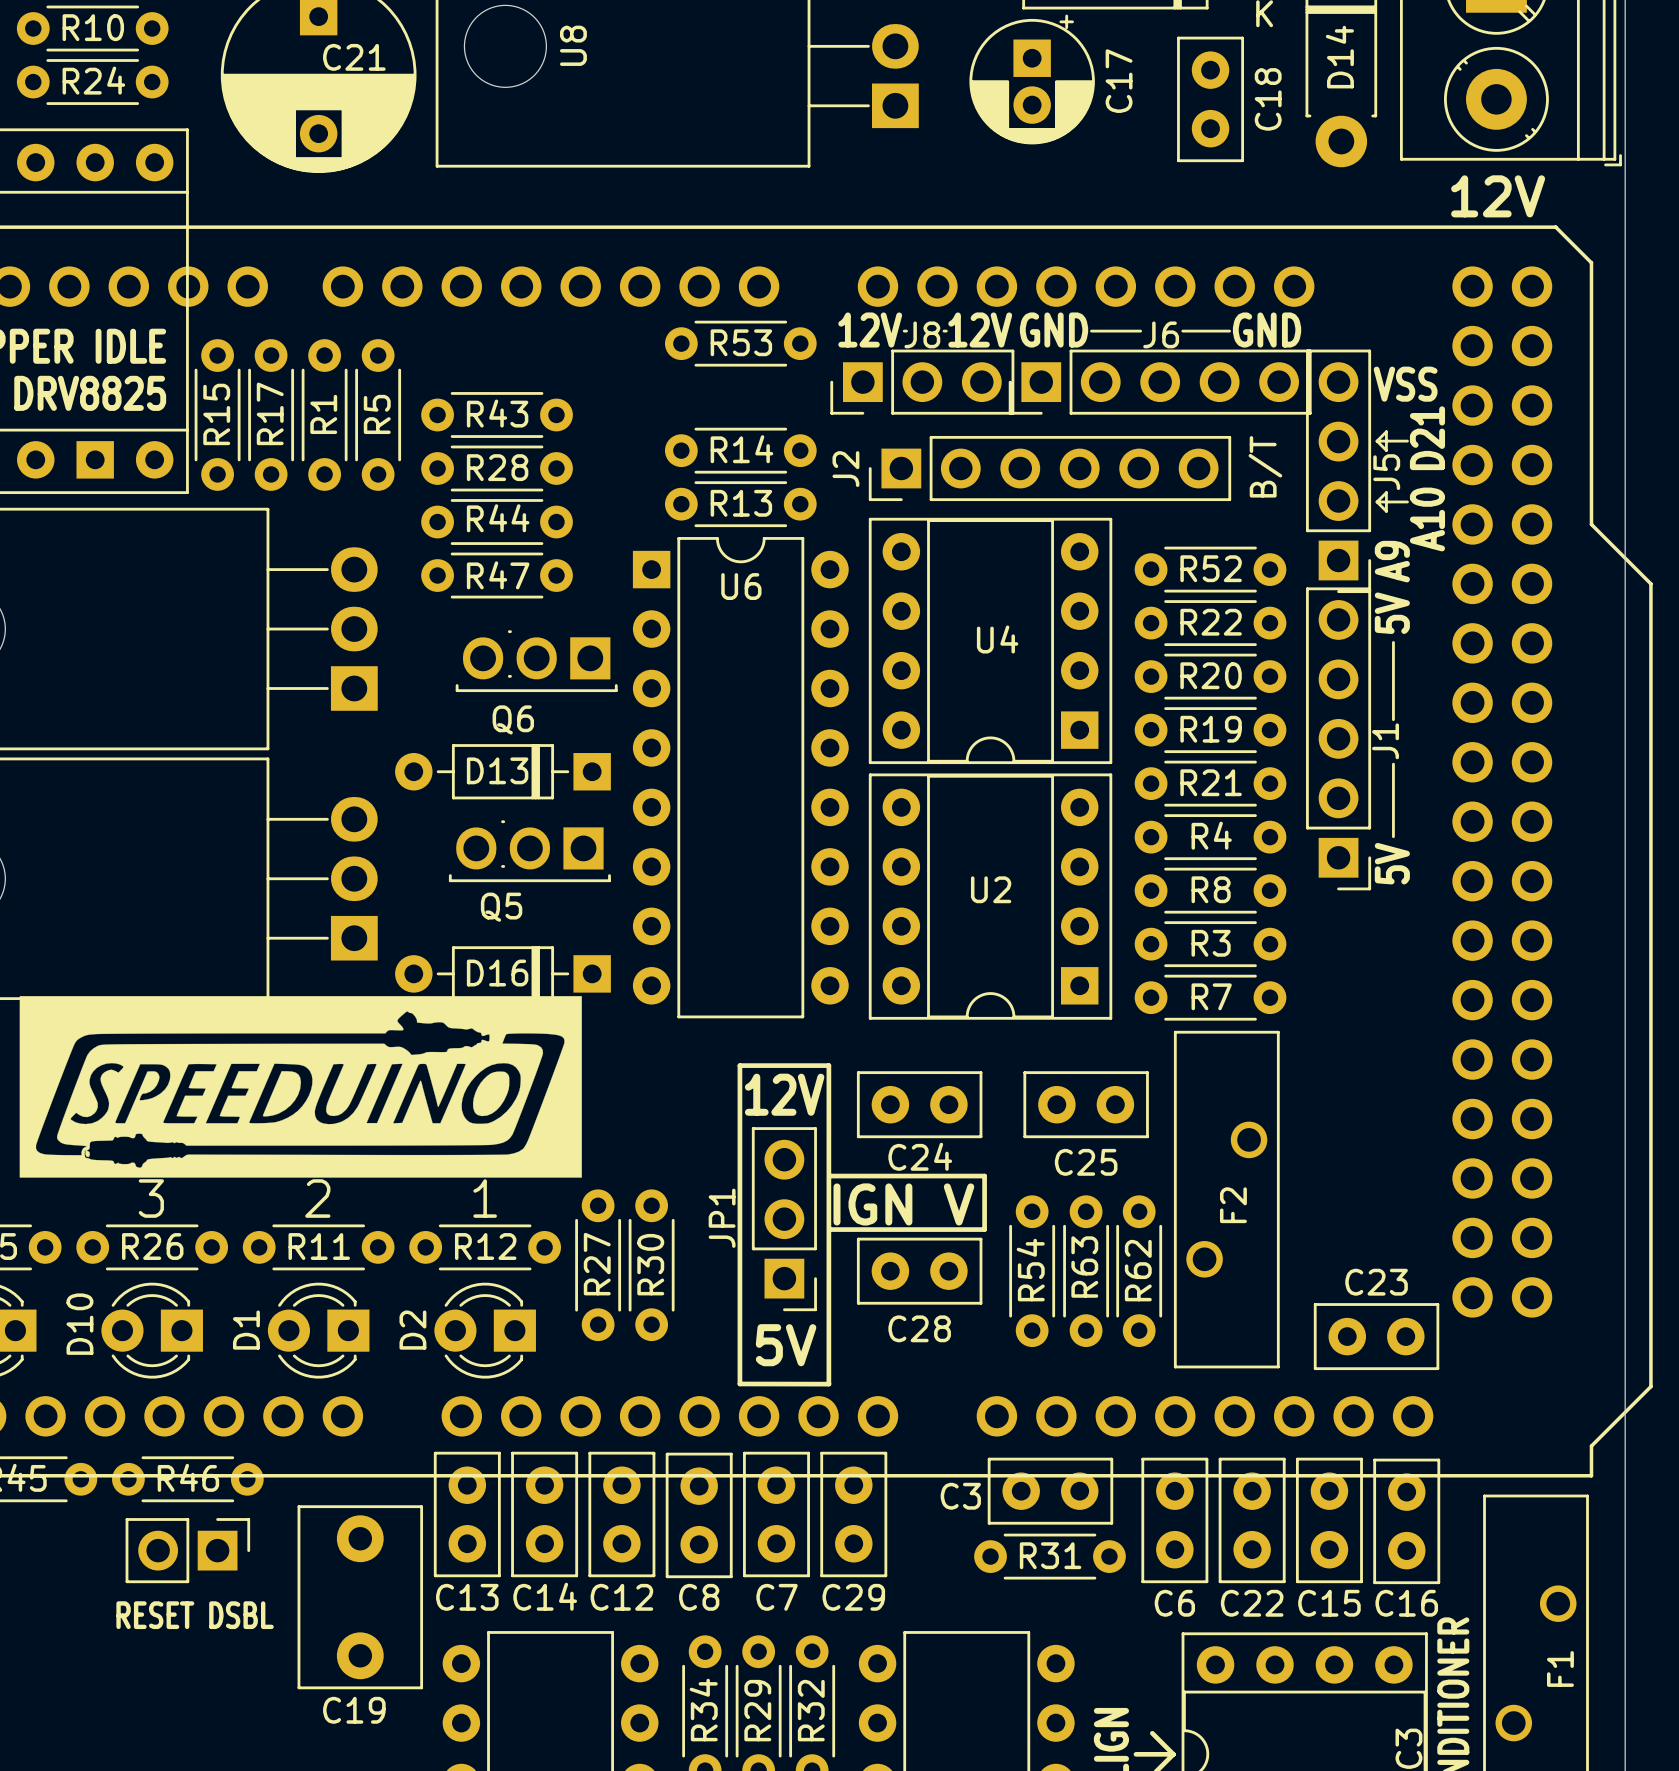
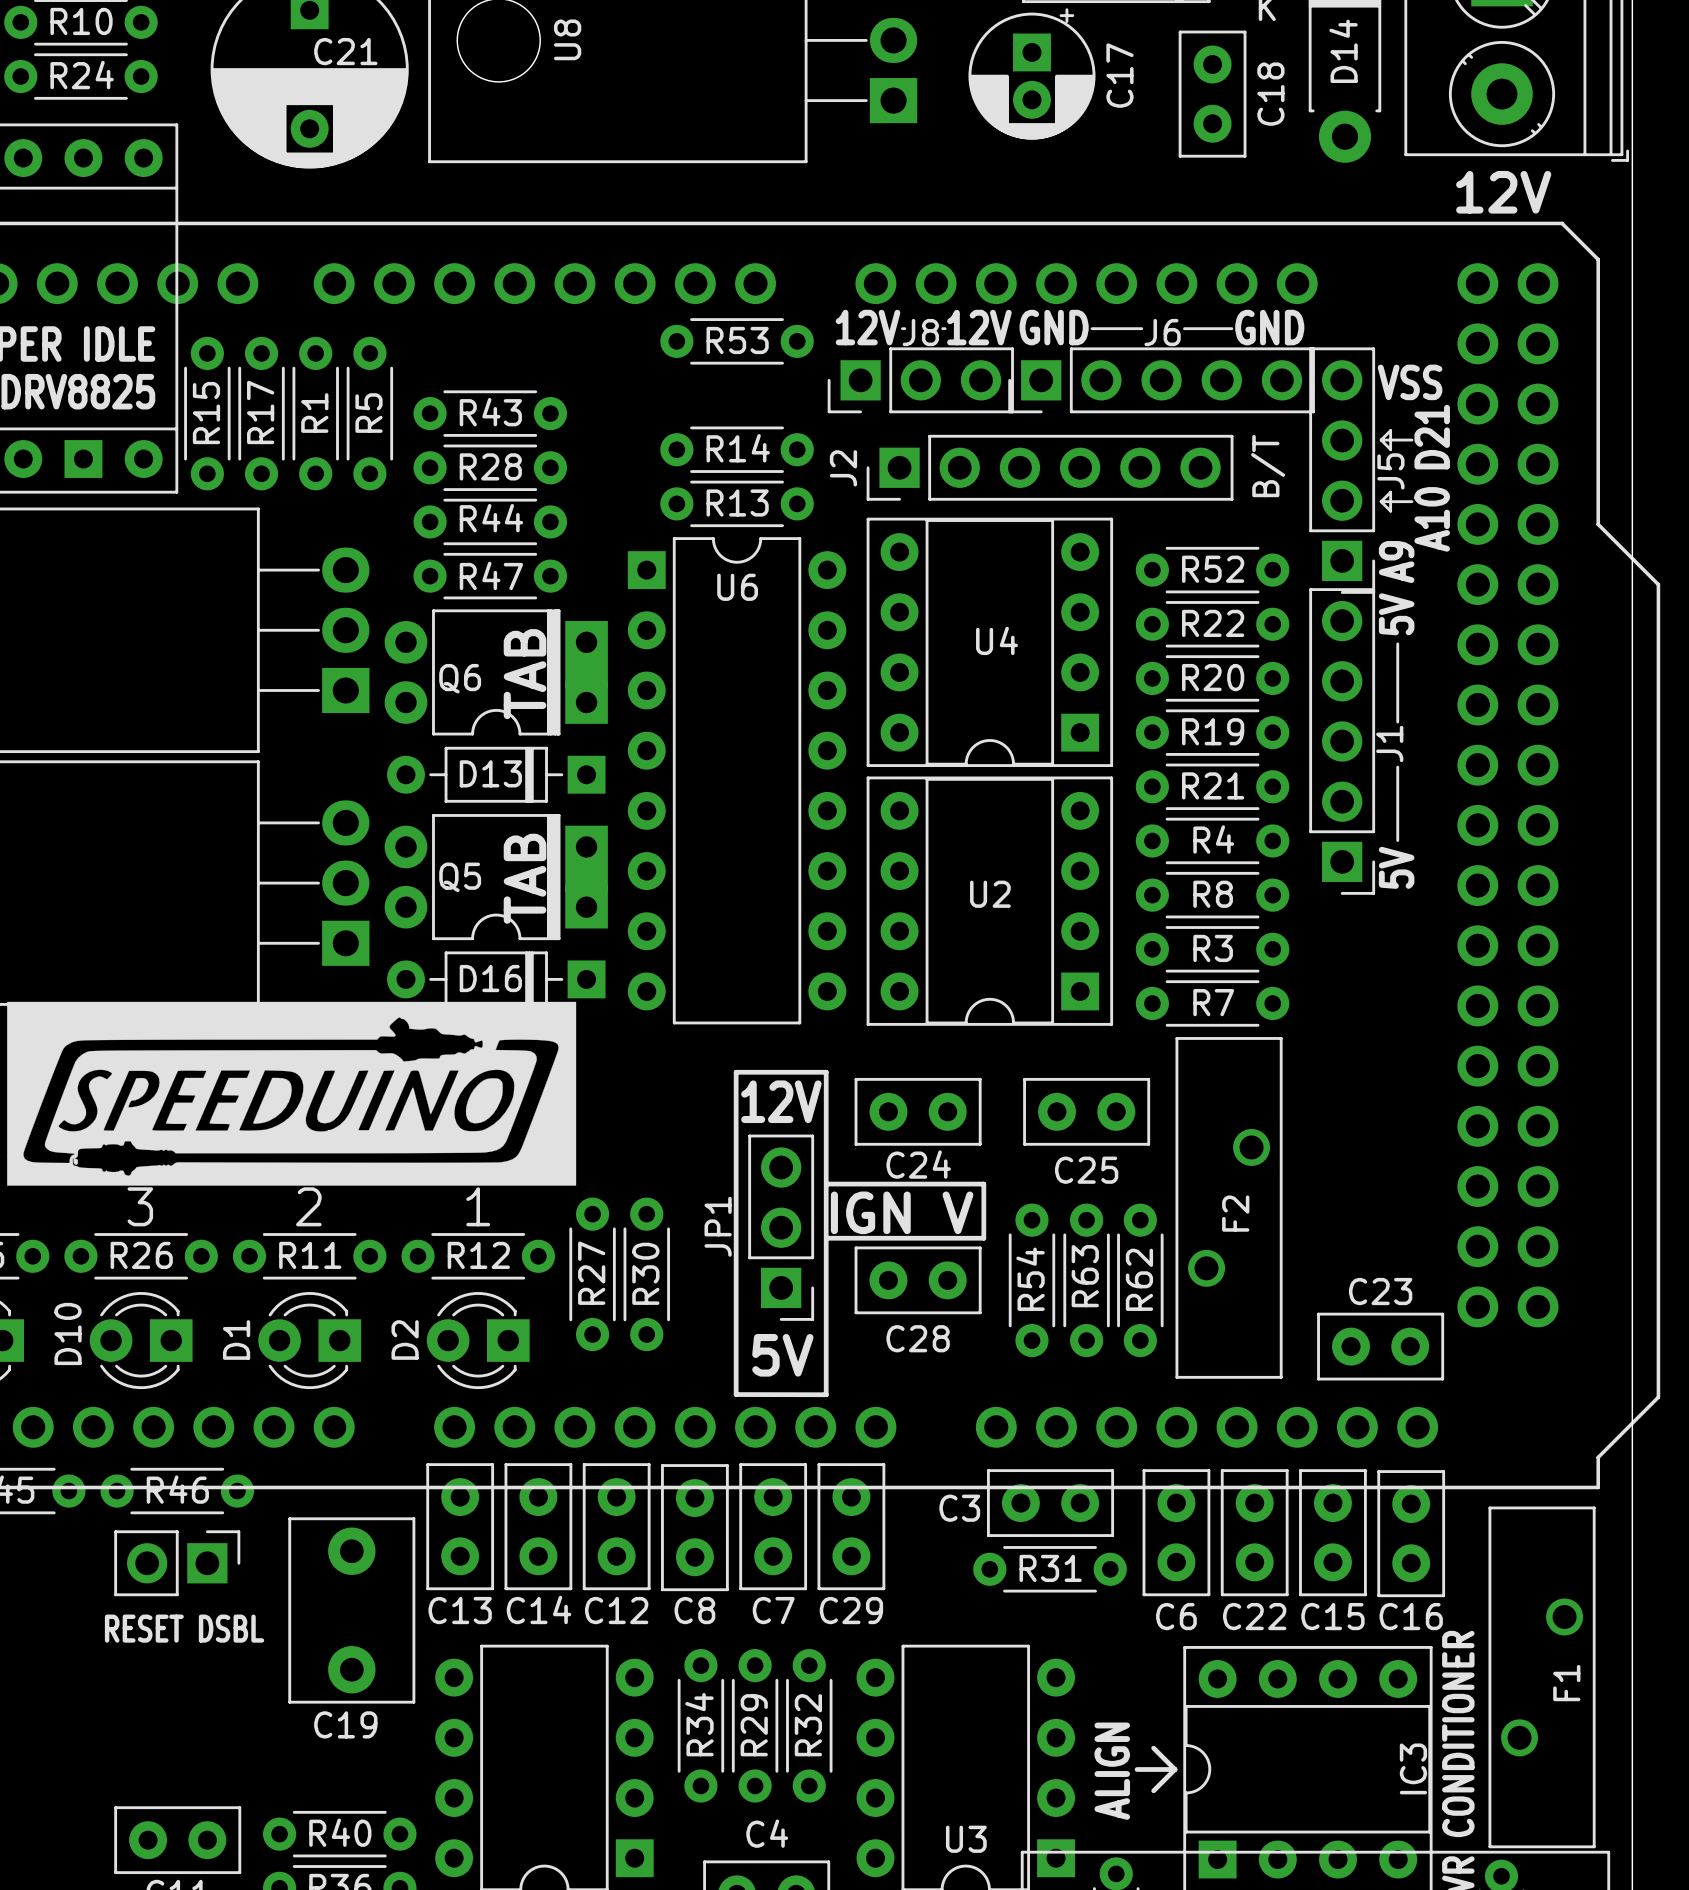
Q6 footprint: [455, 630, 618, 693] -> [384, 609, 608, 736]
text: none -> TAB (525, 674)
Q6 name position: Q6 (513, 719) -> Q6 (460, 678)
Q5 footprint: [448, 820, 611, 883] -> [384, 814, 608, 941]
text: none -> TAB (525, 878)
Q5 name position: Q5 (501, 907) -> Q5 (460, 877)

